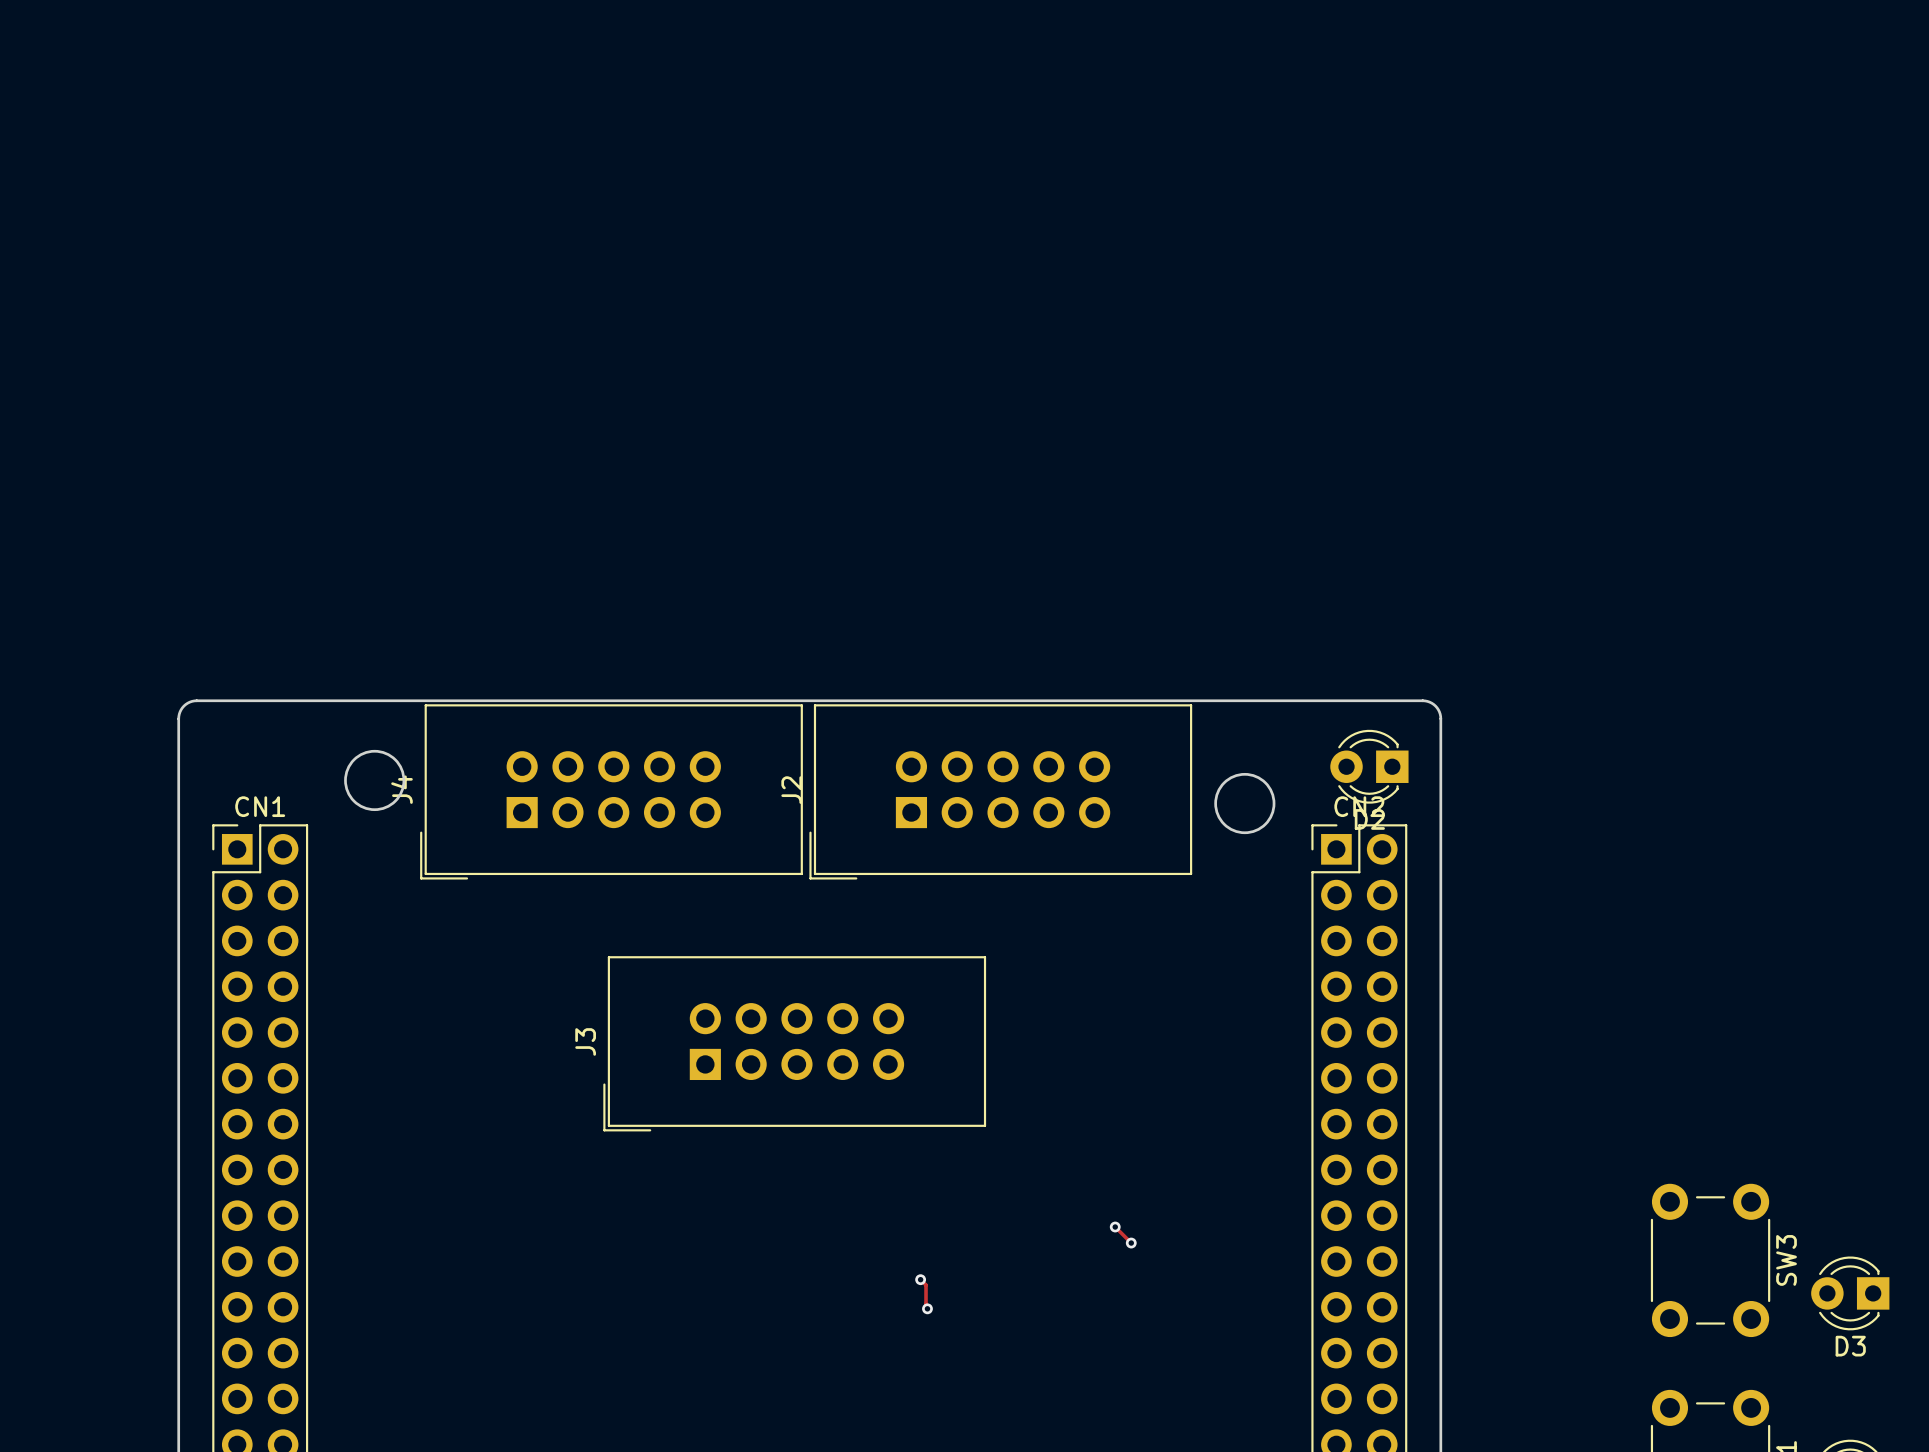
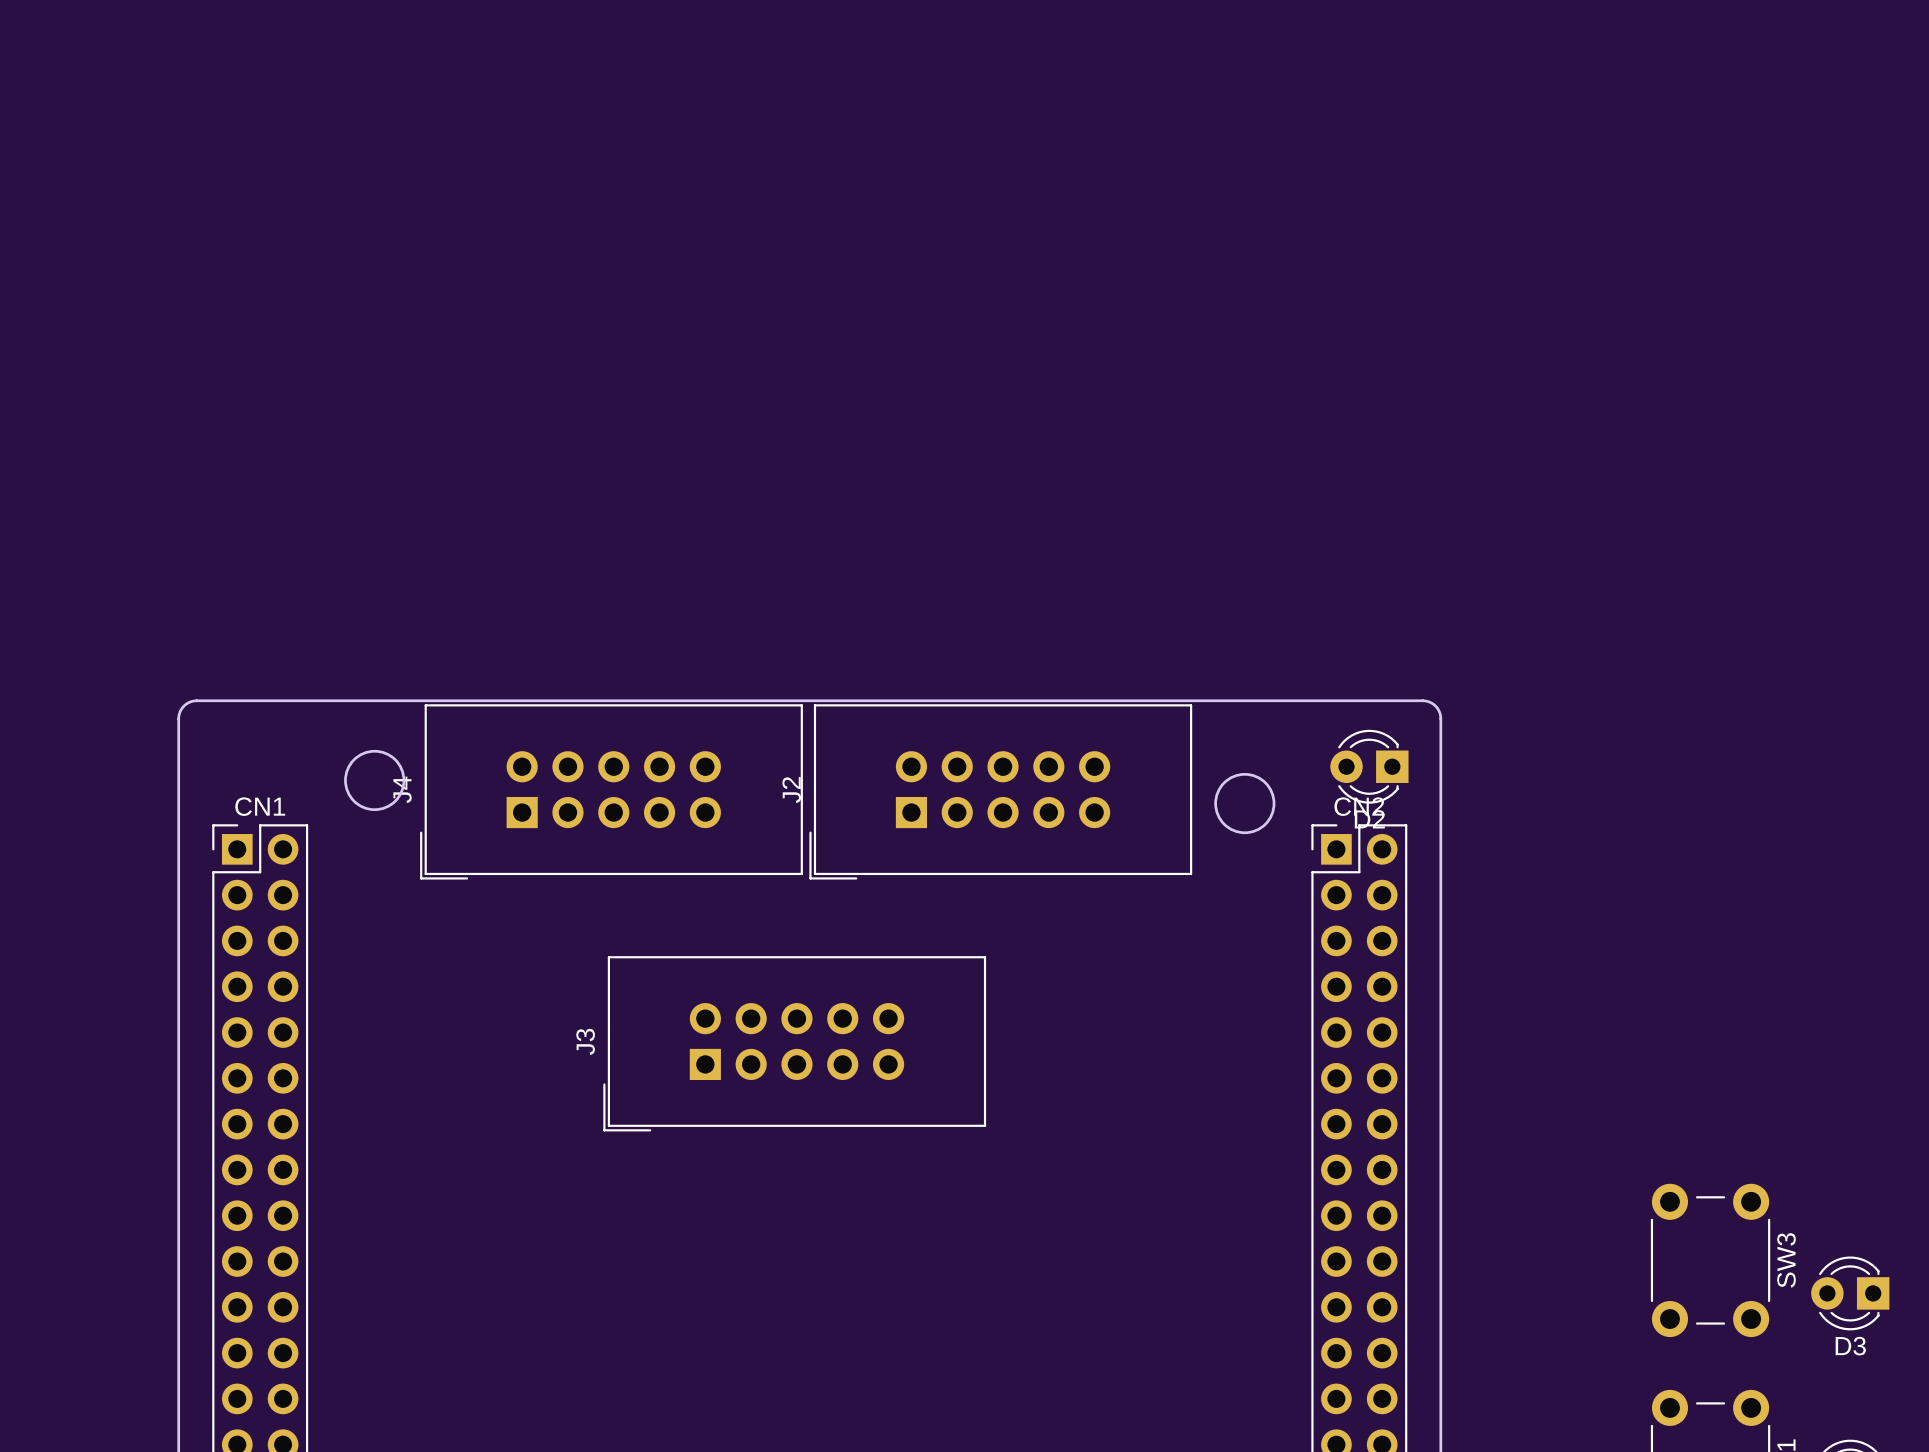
track: (1115, 1227) (1131, 1243) -> none
via: (1115, 1227) -> none
via: (1131, 1243) -> none
track: (920, 1279) (926, 1285) (927, 1308) -> none
via: (920, 1279) -> none
via: (927, 1308) -> none

